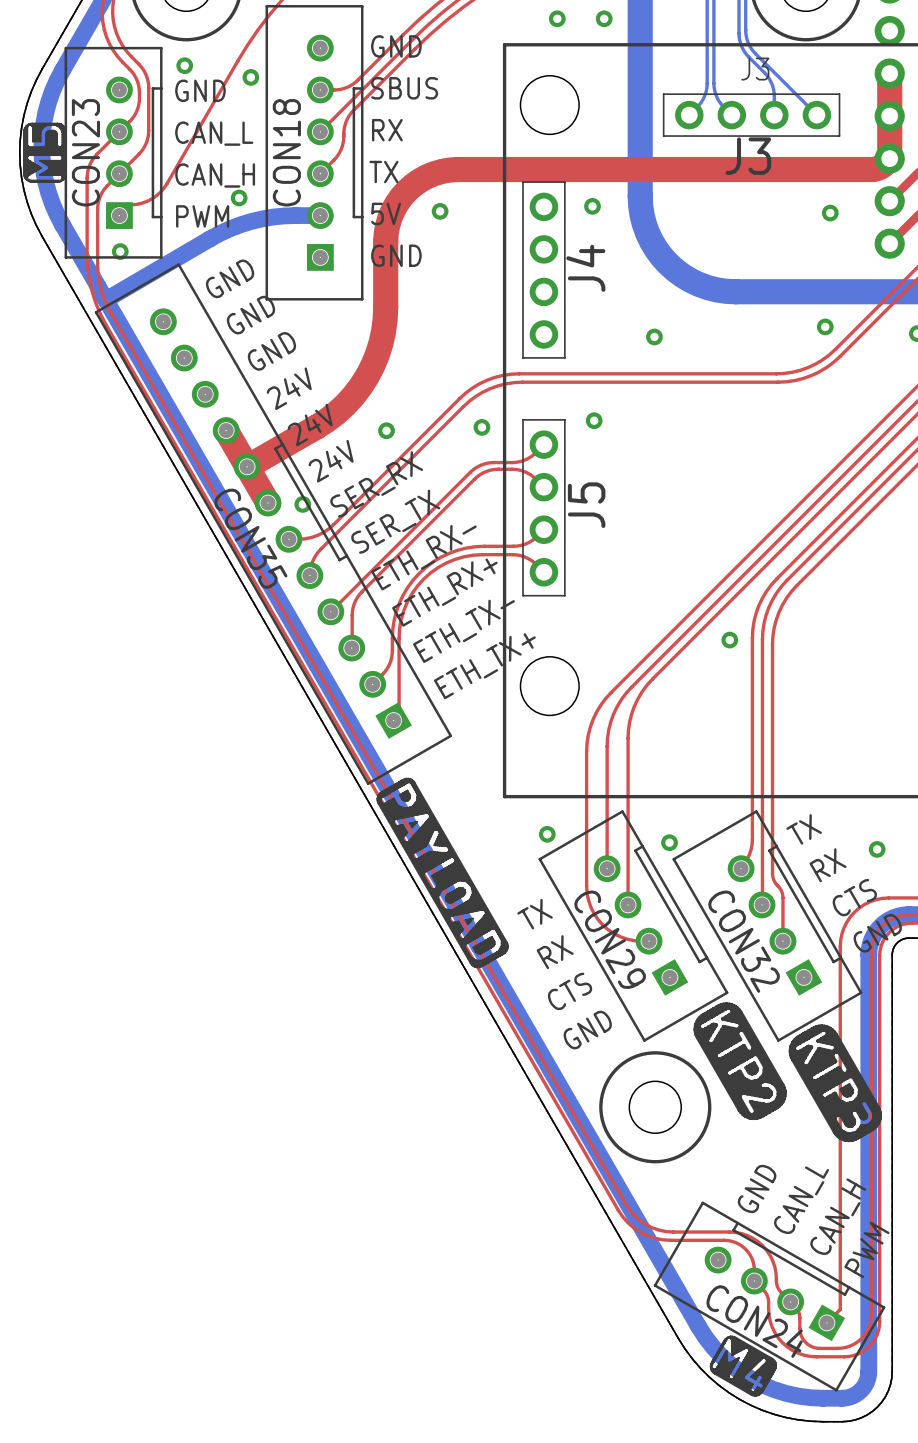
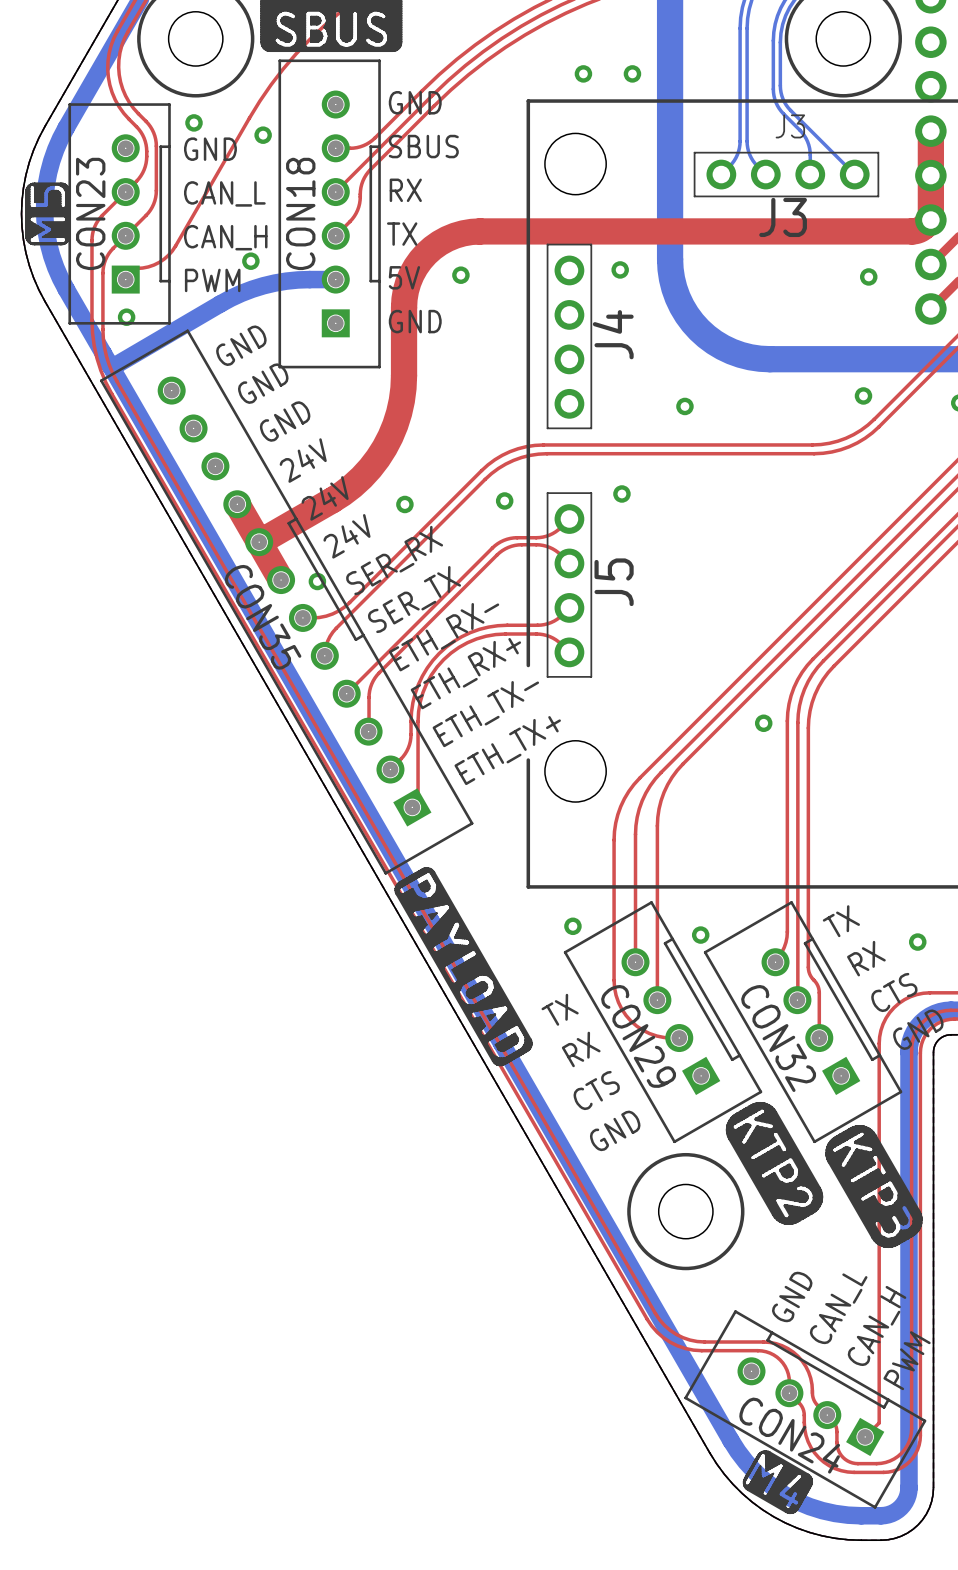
line: (504, 584) (504, 675) -> none

